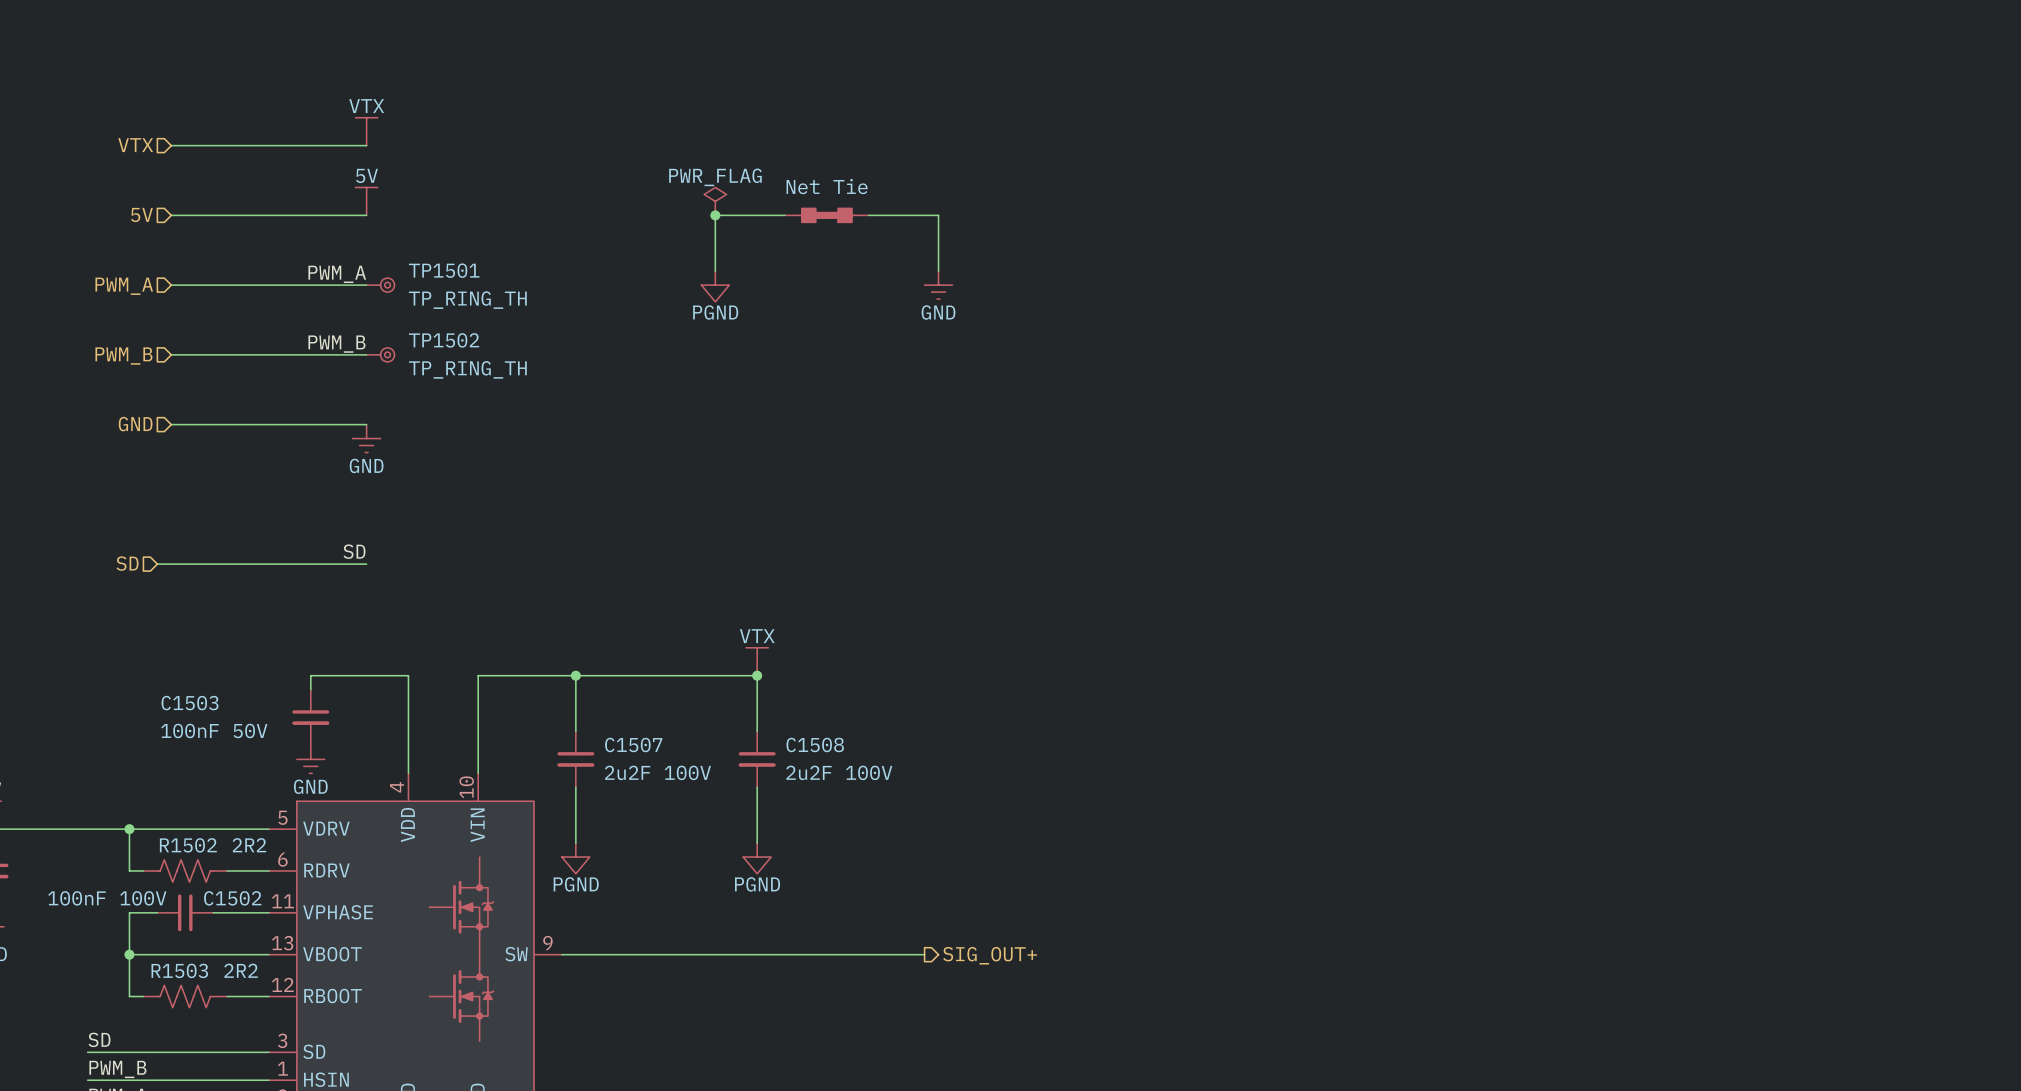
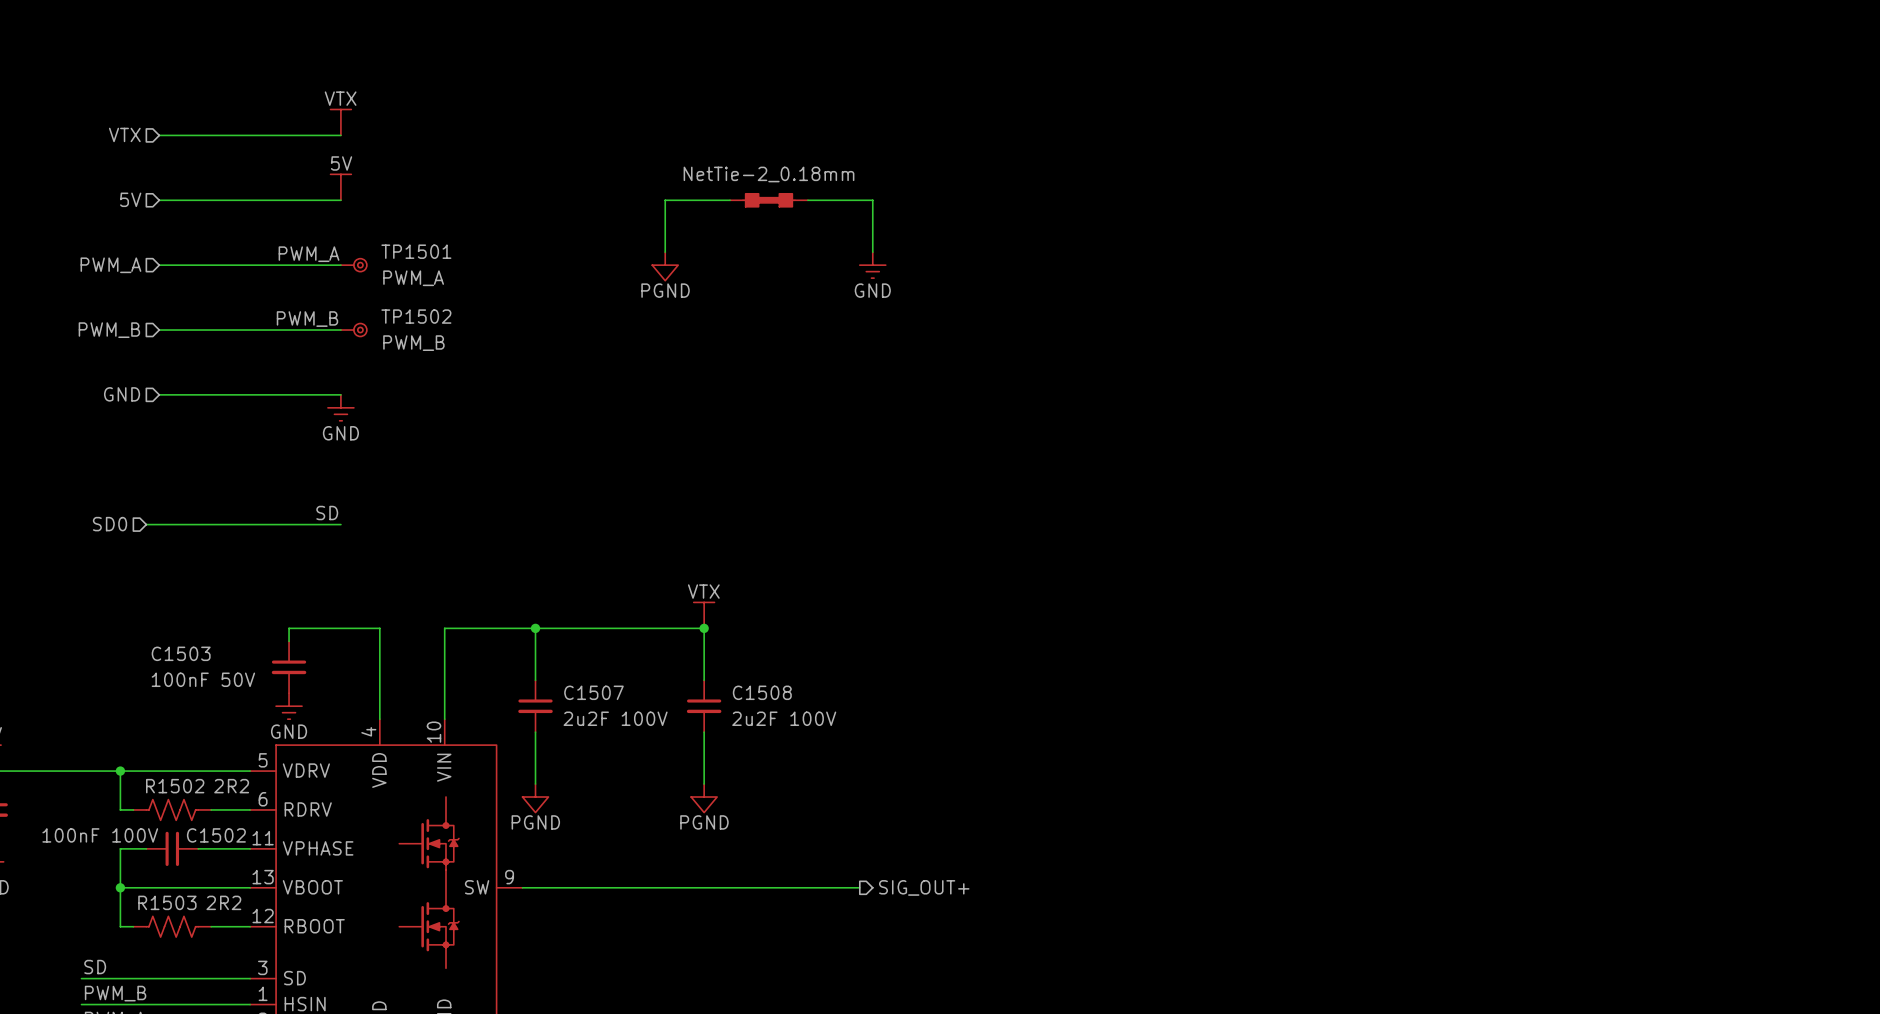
part value: Net Tie (827, 186) -> NetTie-2_0.18mm (769, 174)
power symbol: PWR_FLAG (715, 201) -> none
junction: (715, 215) -> none
TP1501 value: TP_RING_TH (467, 300) -> PWM_A (413, 278)
TP1502 value: TP_RING_TH (467, 369) -> PWM_B (413, 343)
hierarchical label: SD (127, 563) -> SD0 (110, 524)

